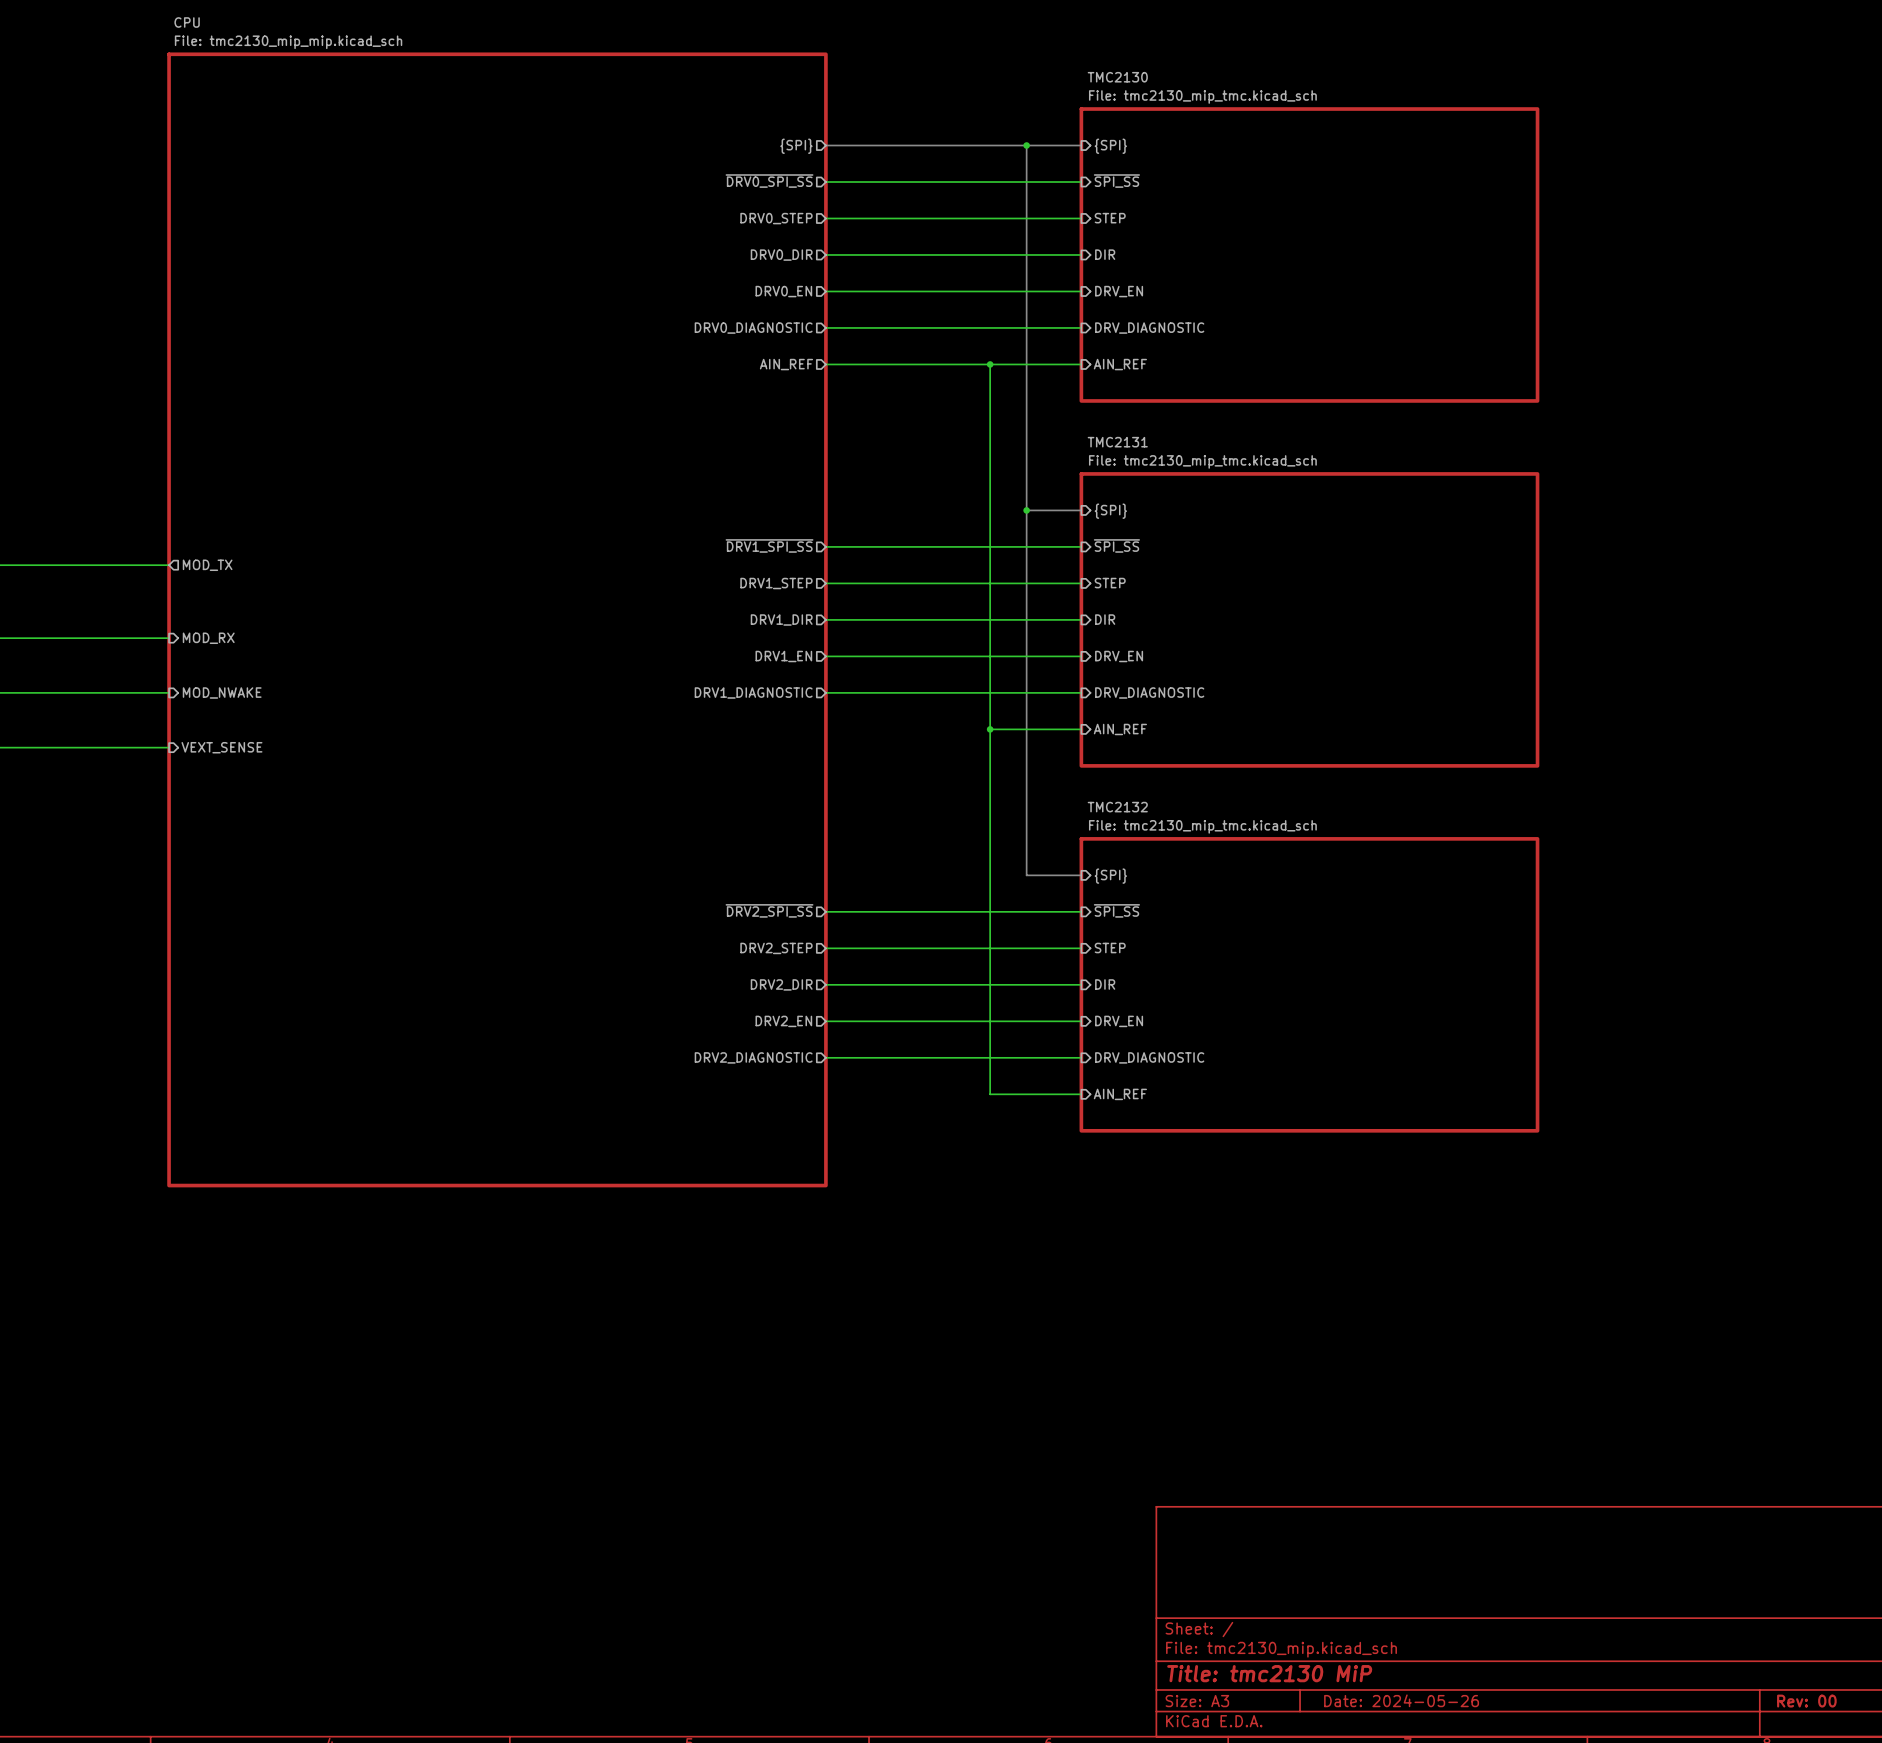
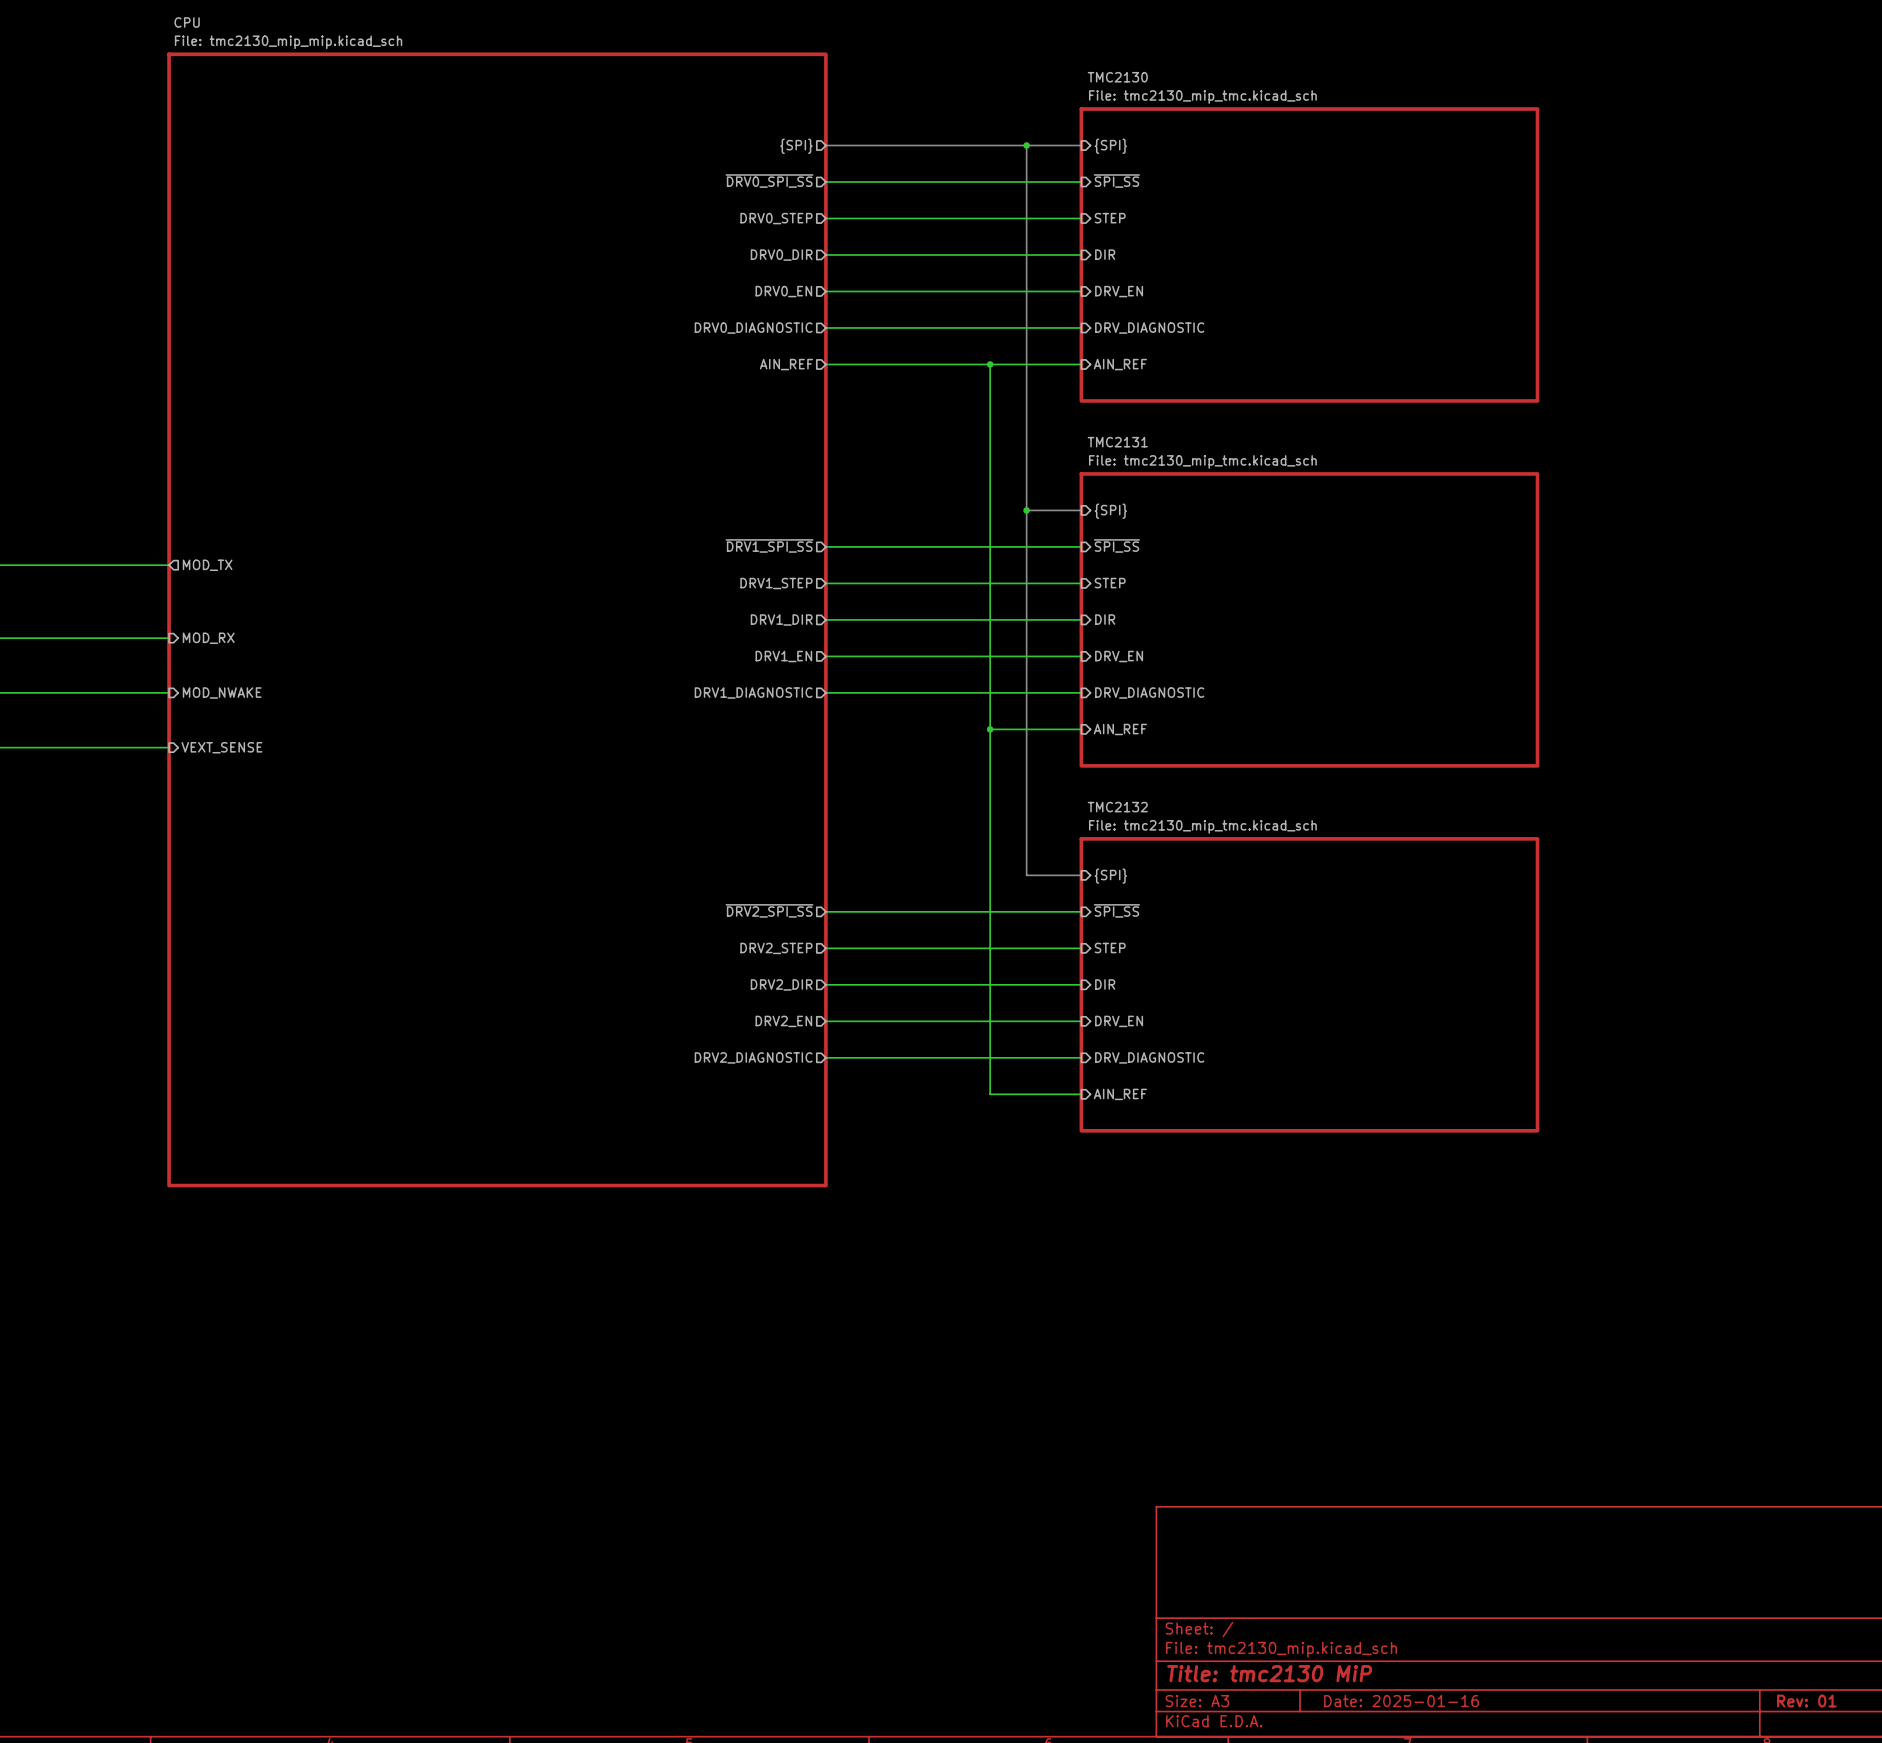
title block: Date: 2024-05-26 (1401, 1700) -> Date: 2025-01-16 (1401, 1701)
title block: Rev: 00 (1806, 1701) -> Rev: 01 (1806, 1701)

